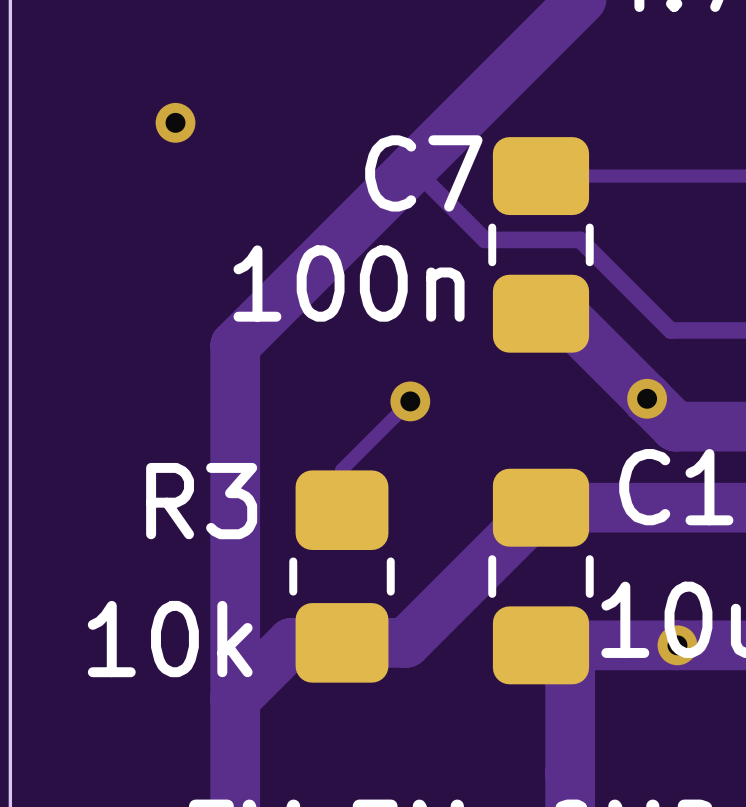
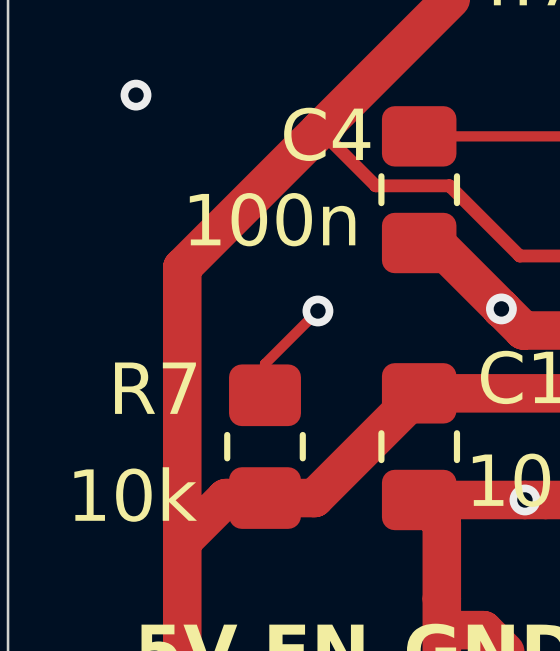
C7 name: C7 (423, 173) -> C4 (327, 134)
R3 name: R3 (201, 501) -> R7 (155, 388)

